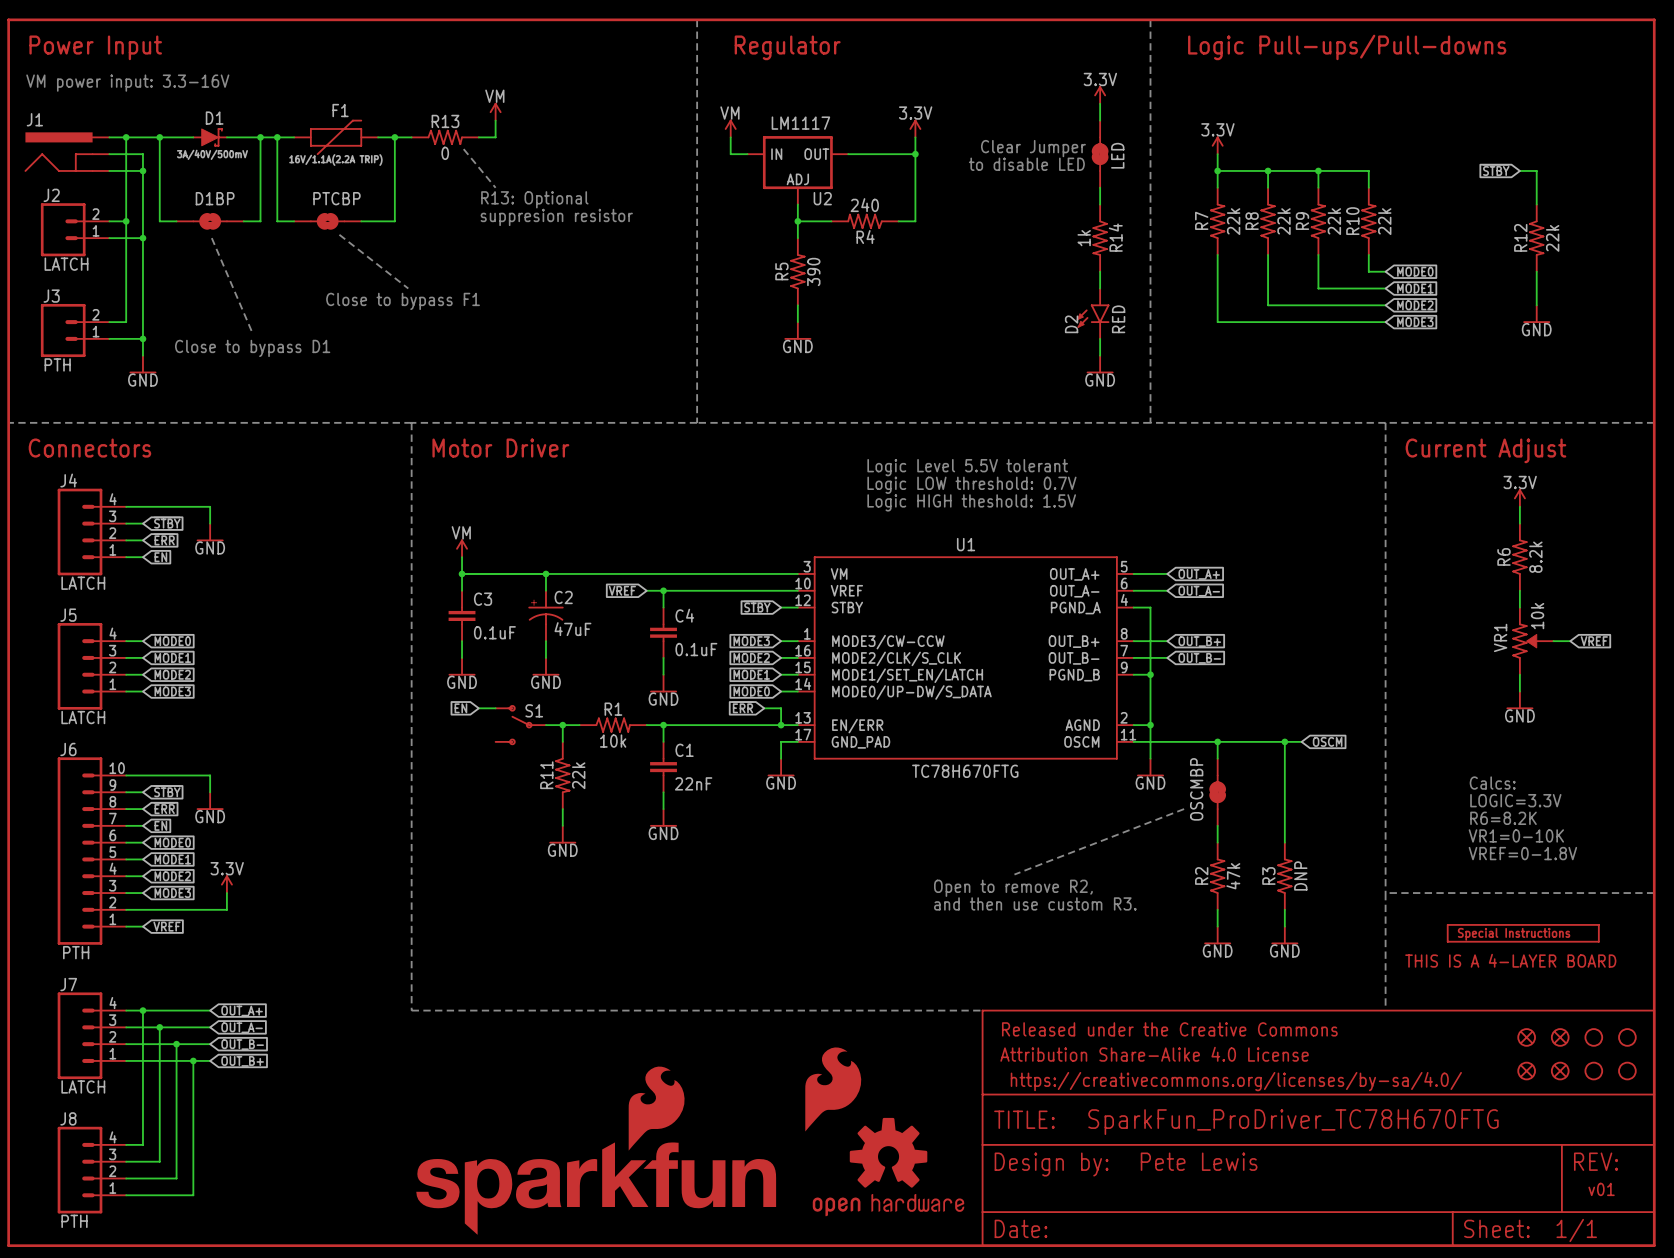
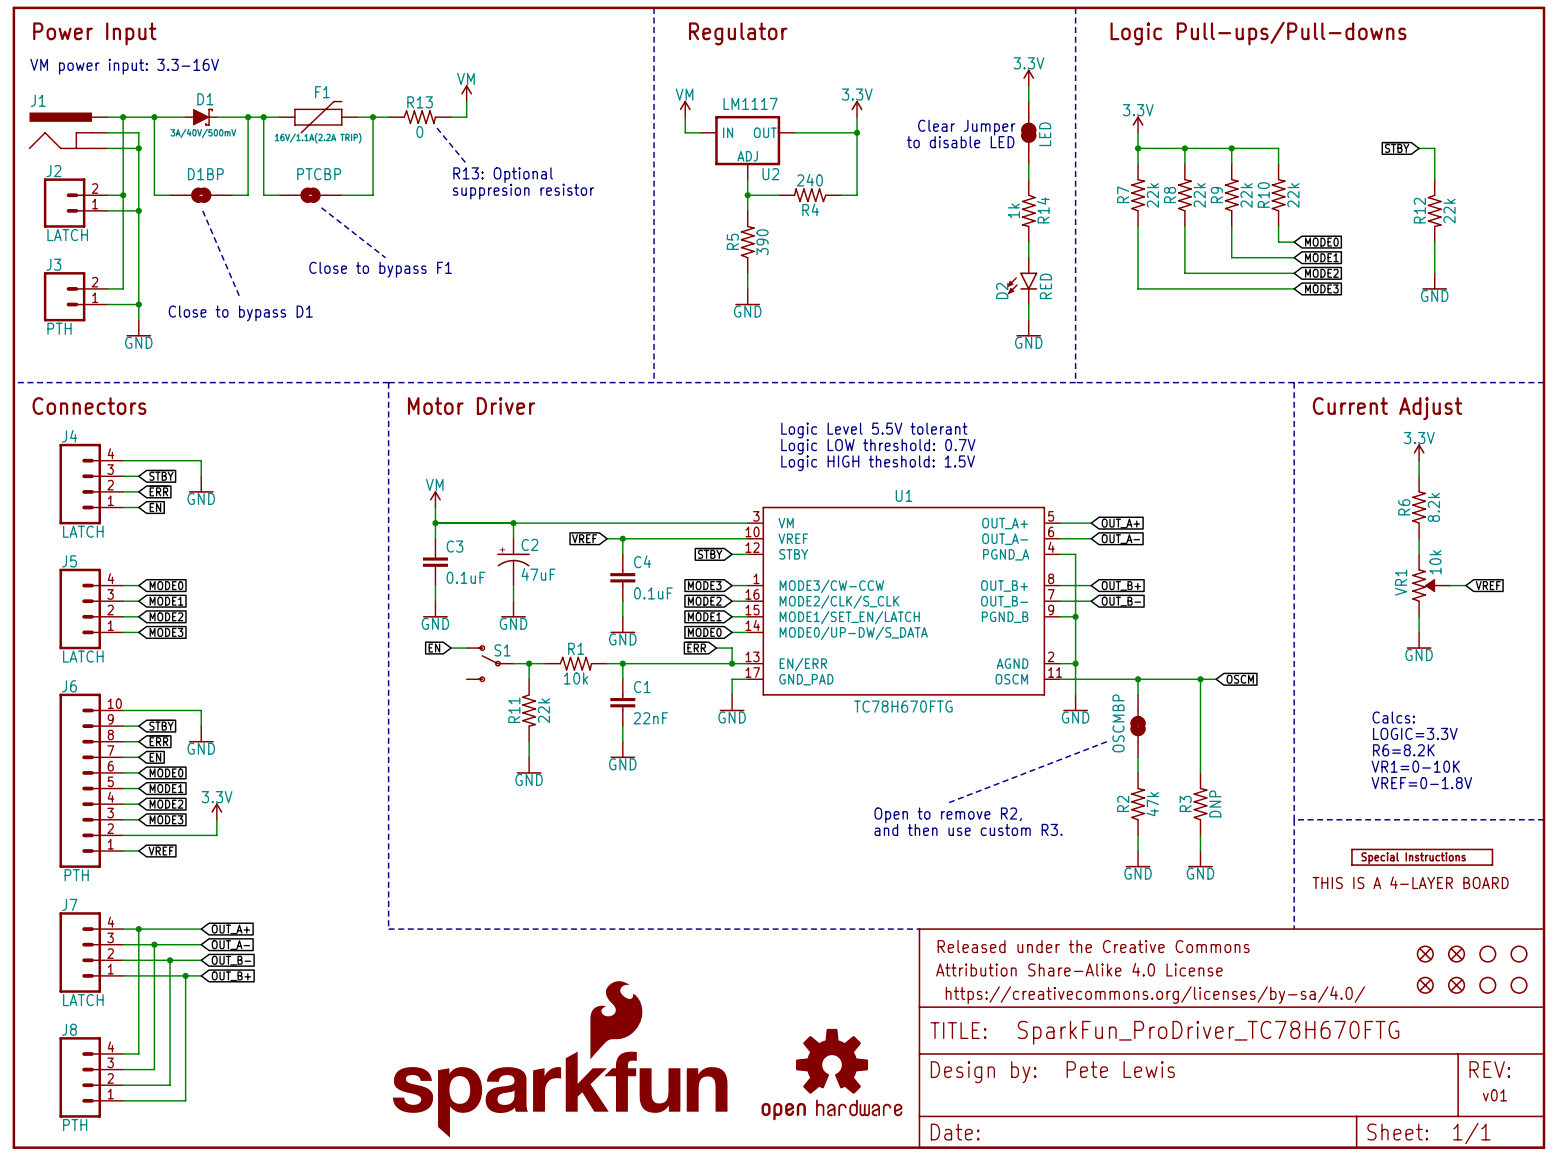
text position: Logic Level 5.5V tolerant (967, 467) -> Logic Level 5.5V tolerant (874, 430)
text position: Logic LOW threshold: 0.7V (971, 485) -> Logic LOW threshold: 0.7V (878, 446)
text position: Logic HIGH theshold: 1.5V (971, 502) -> Logic HIGH theshold: 1.5V (878, 463)
part: (833, 1089) -> none

